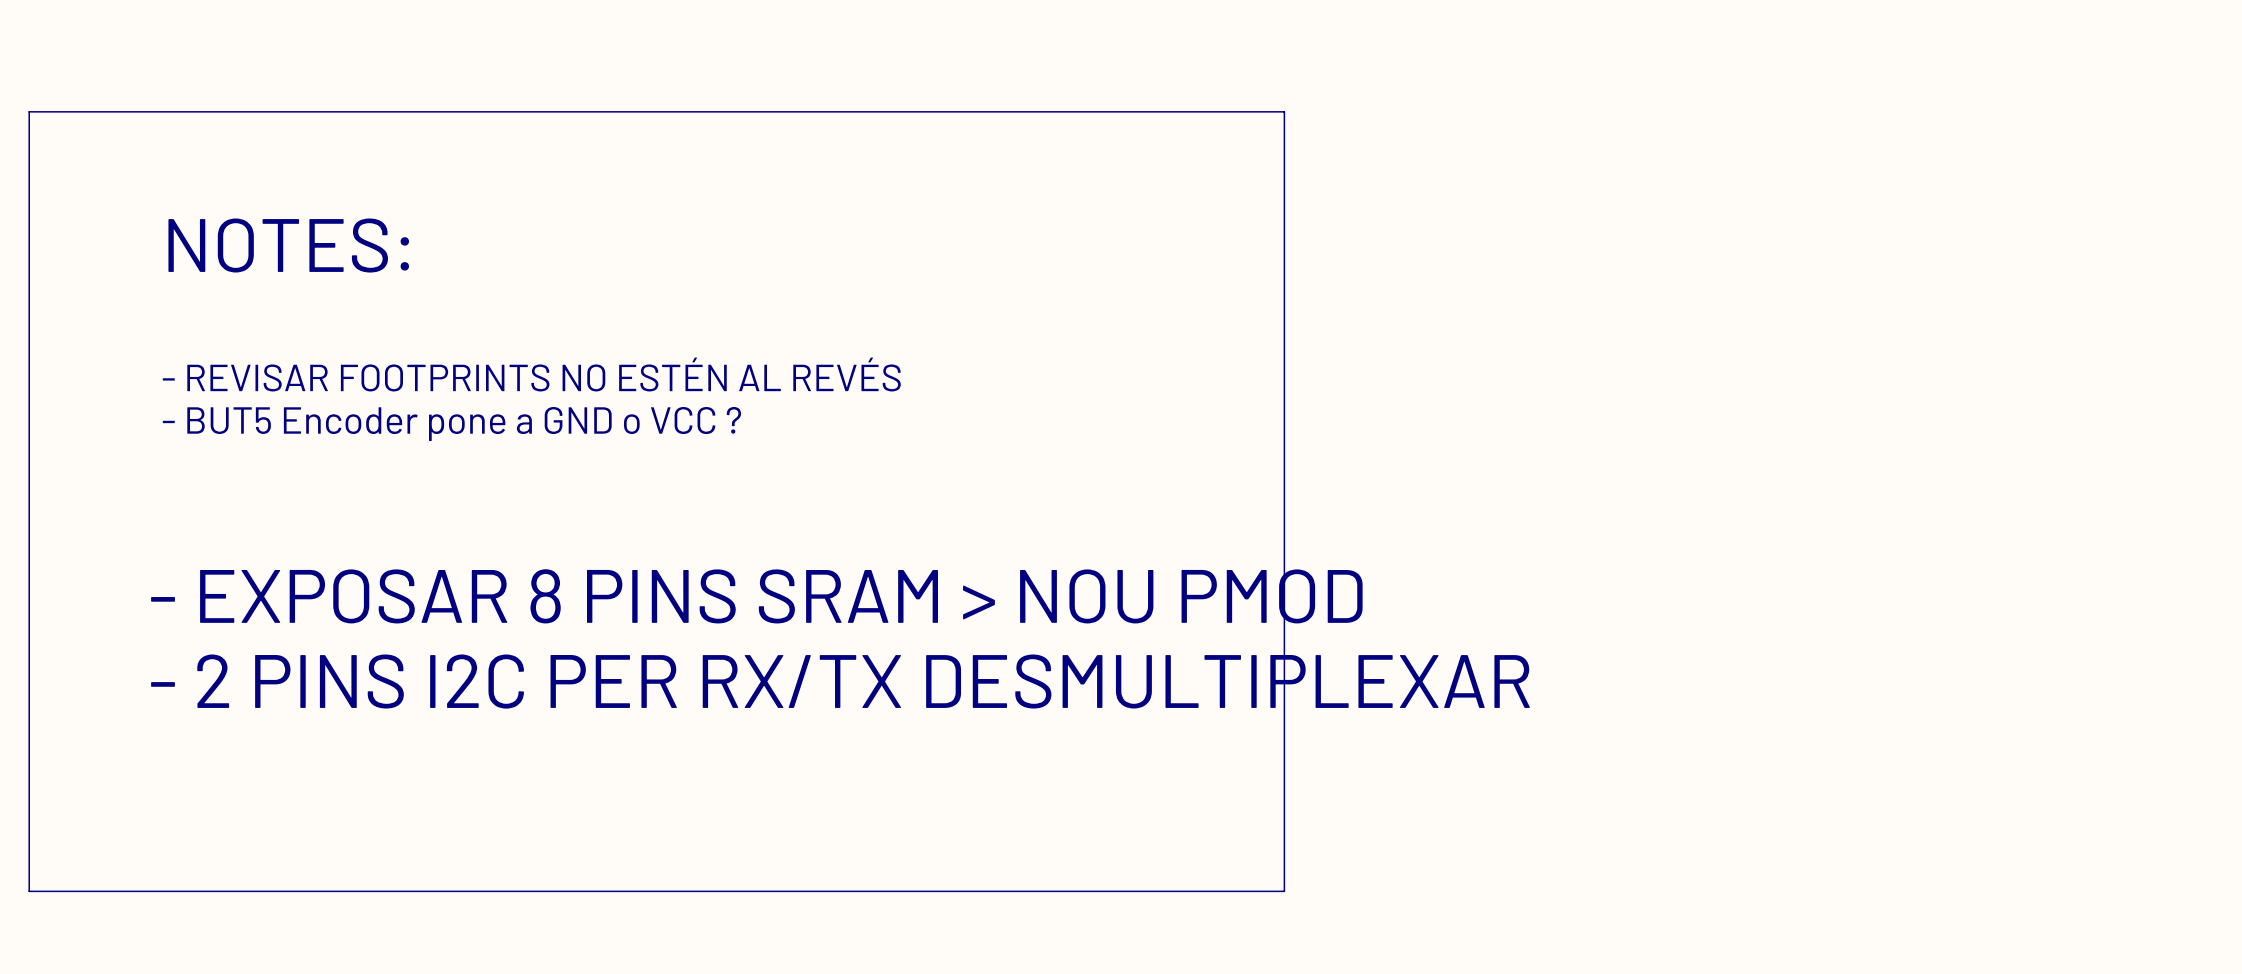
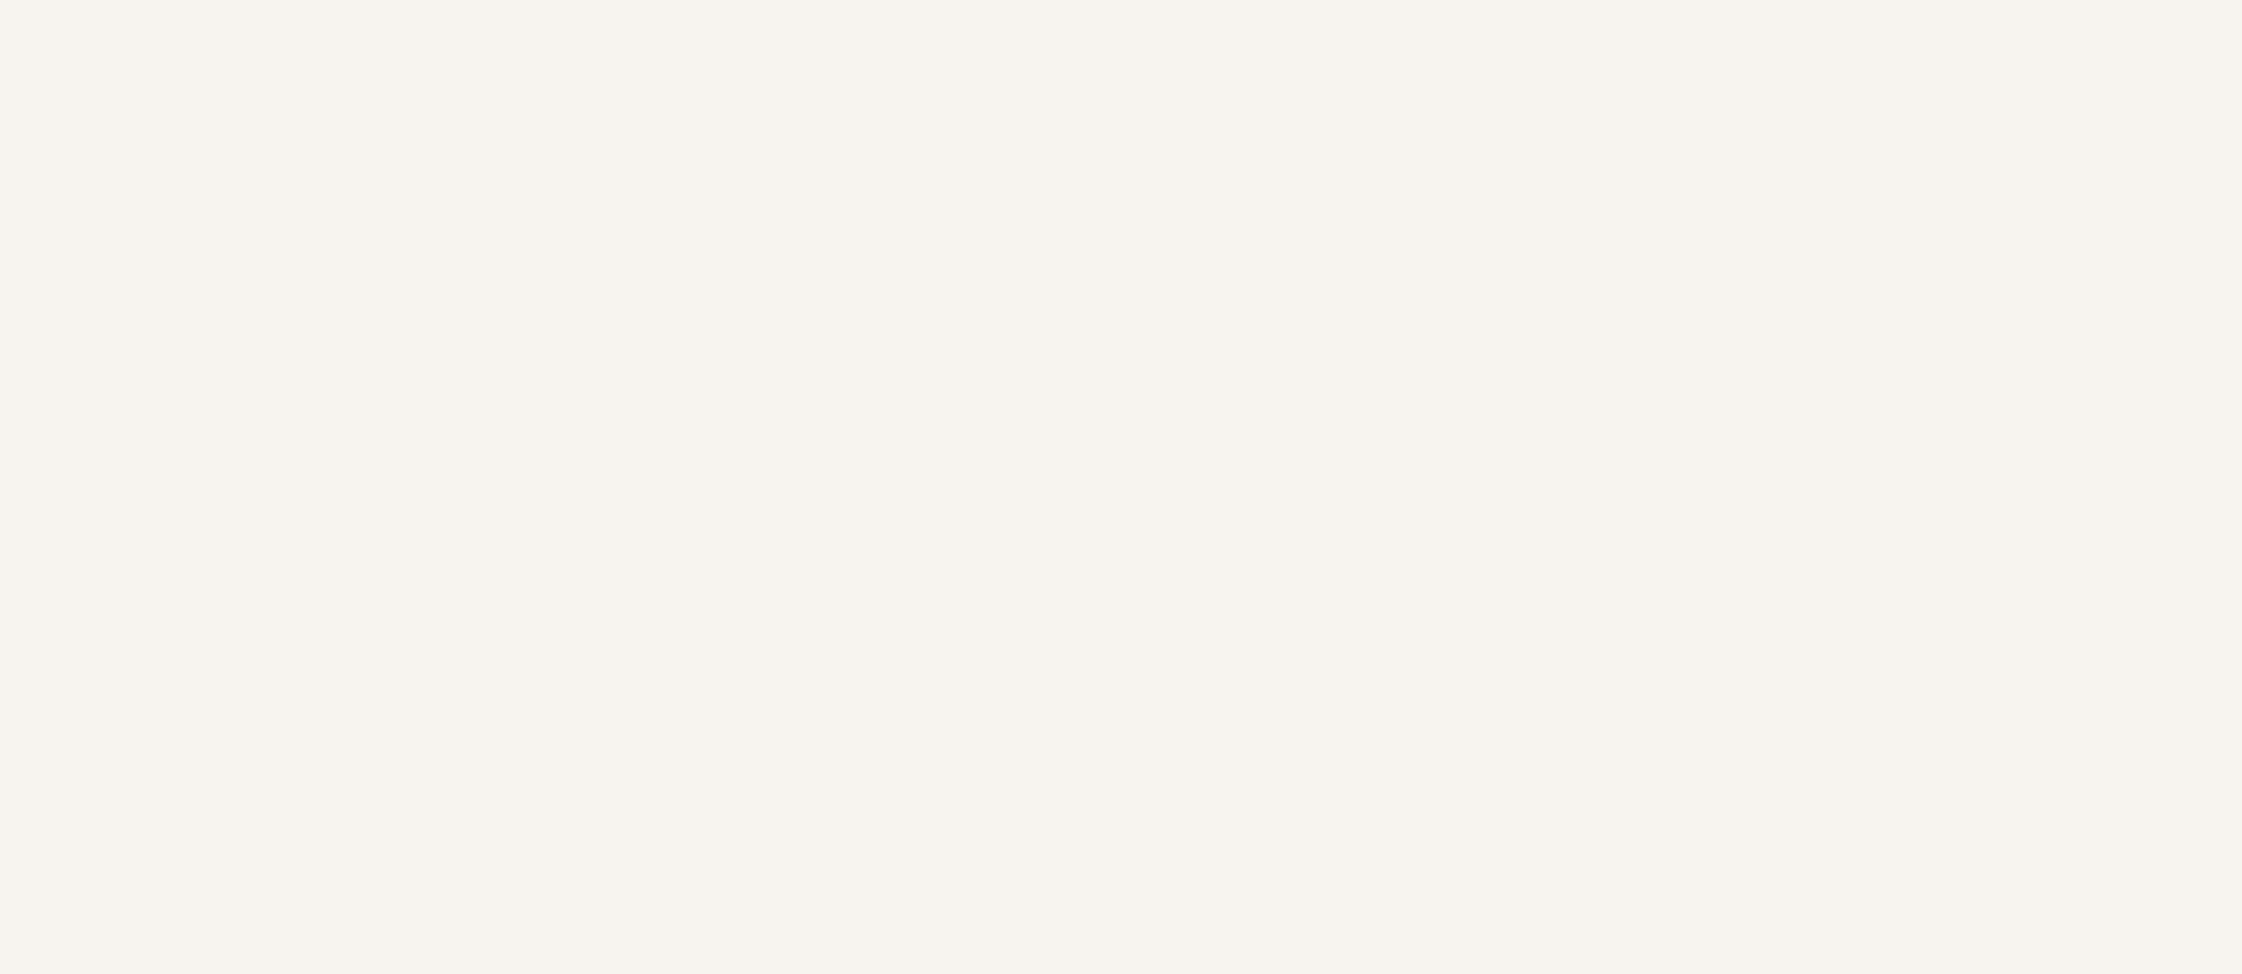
line: (29, 111) (1284, 111) (1284, 891) (29, 891) (29, 111) -> none
text: NOTES: (288, 245) -> none
text: - REVISAR FOOTPRINTS NO ESTÉN AL REVÉS (531, 374) -> none
text: - BUT5 Encoder pone a GND o VCC ? (451, 423) -> none
text: - EXPOSAR 8 PINS SRAM > NOU PMOD (756, 596) -> none
text: - 2 PINS I2C PER RX/TX DESMULTIPLEXAR (840, 681) -> none

